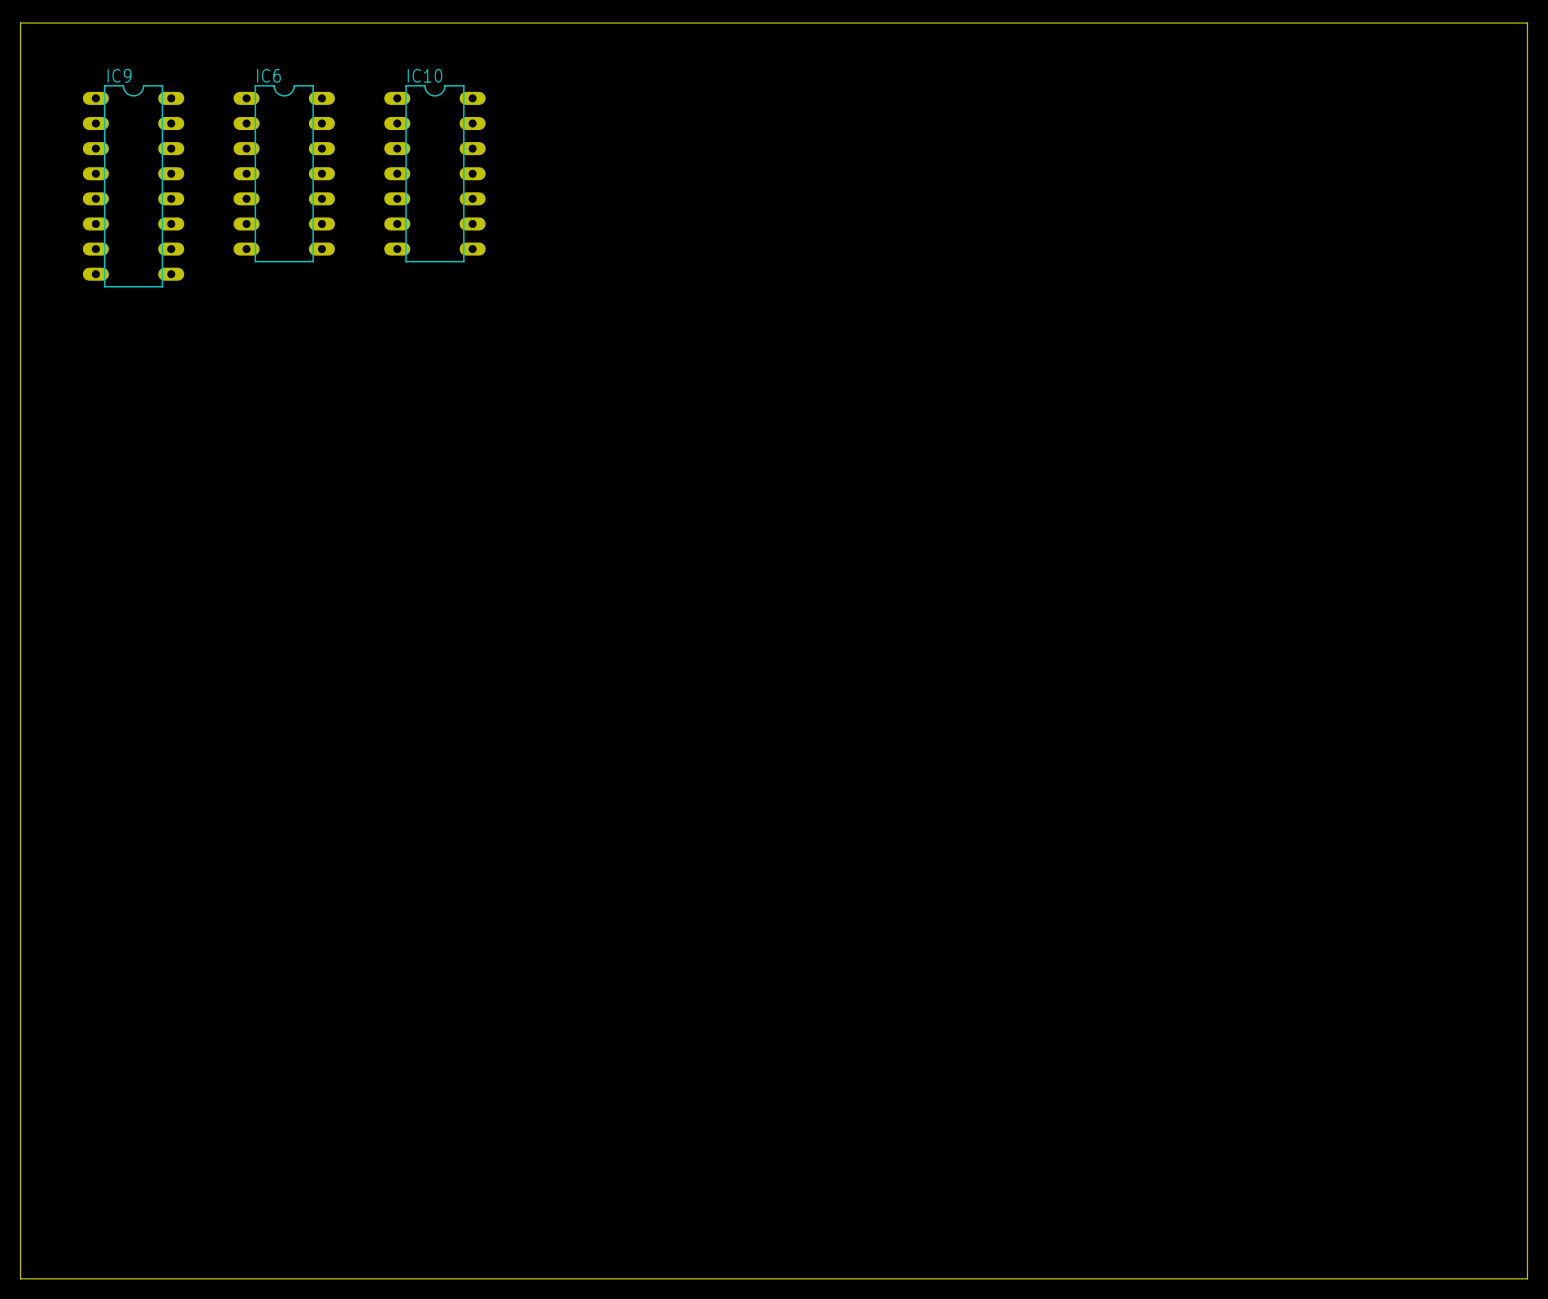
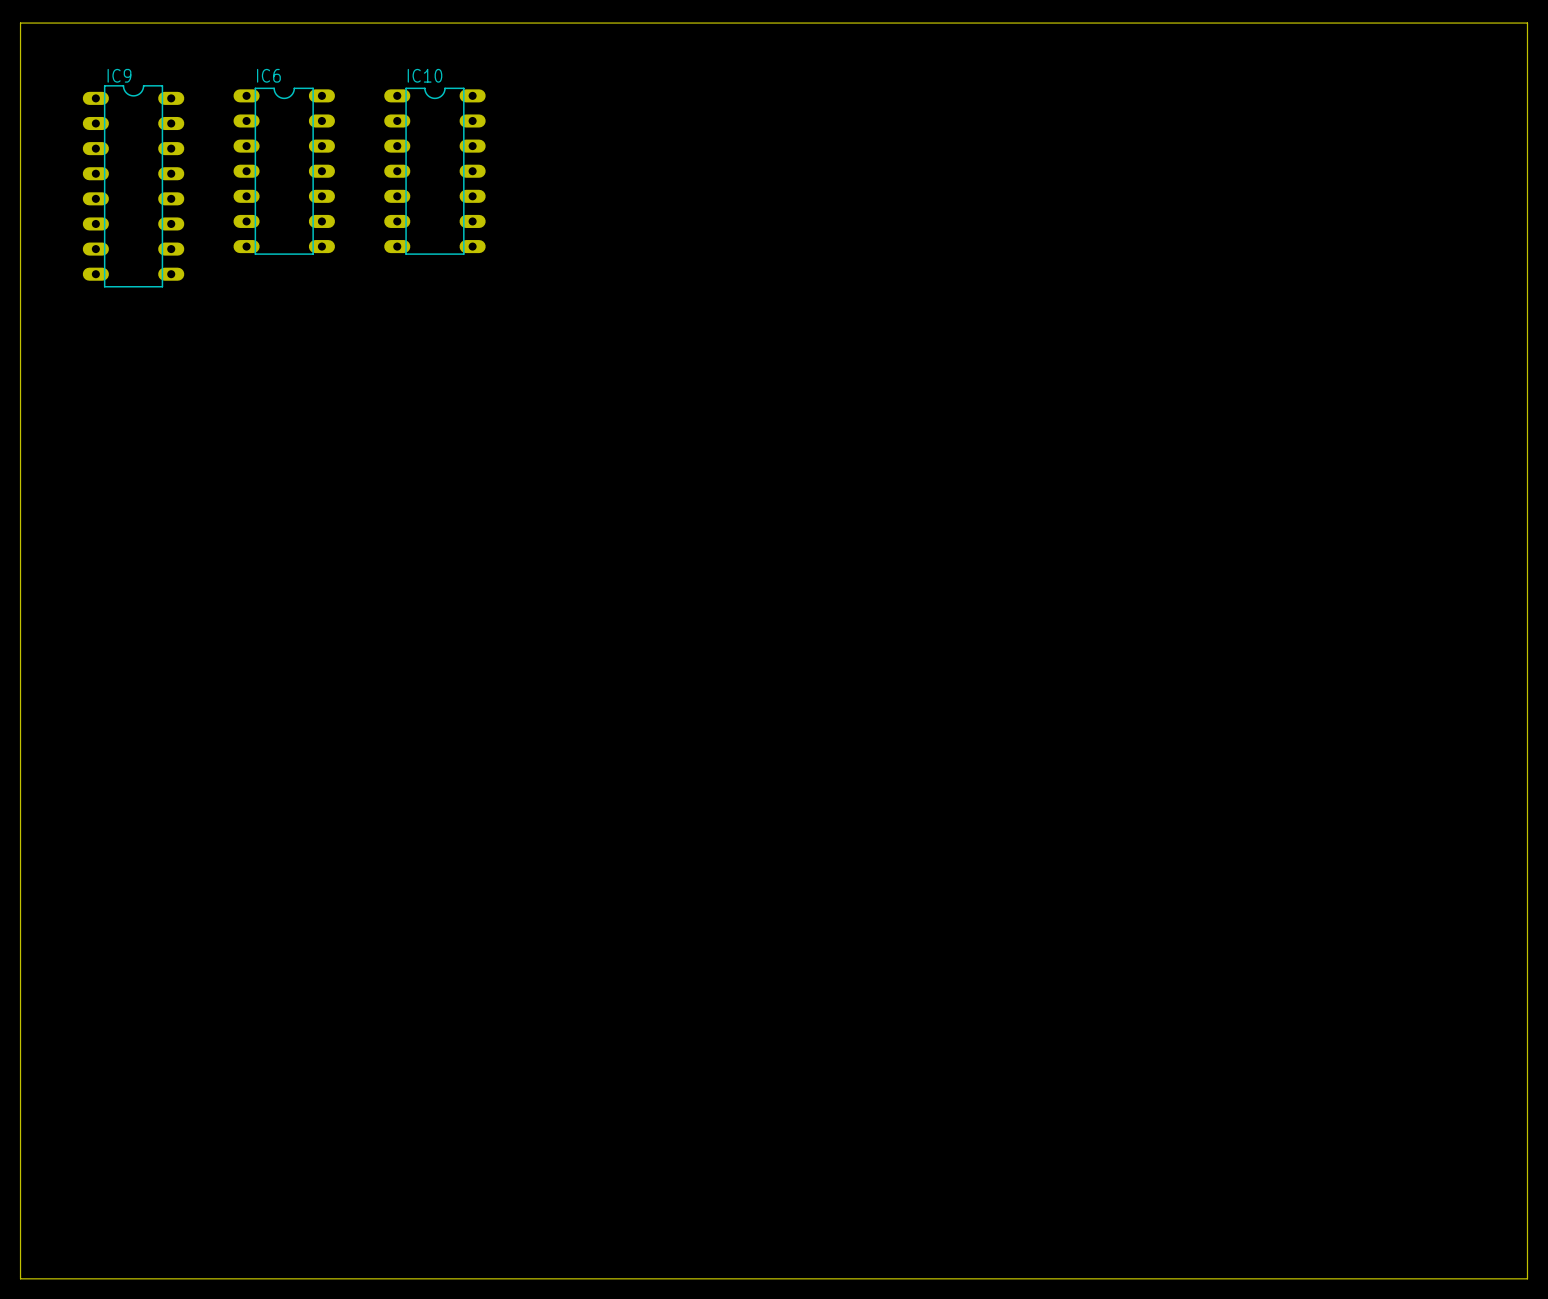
IC6 footprint: [233, 85, 335, 263] -> [233, 87, 335, 255]
IC10 footprint: [384, 85, 486, 263] -> [384, 87, 486, 255]

